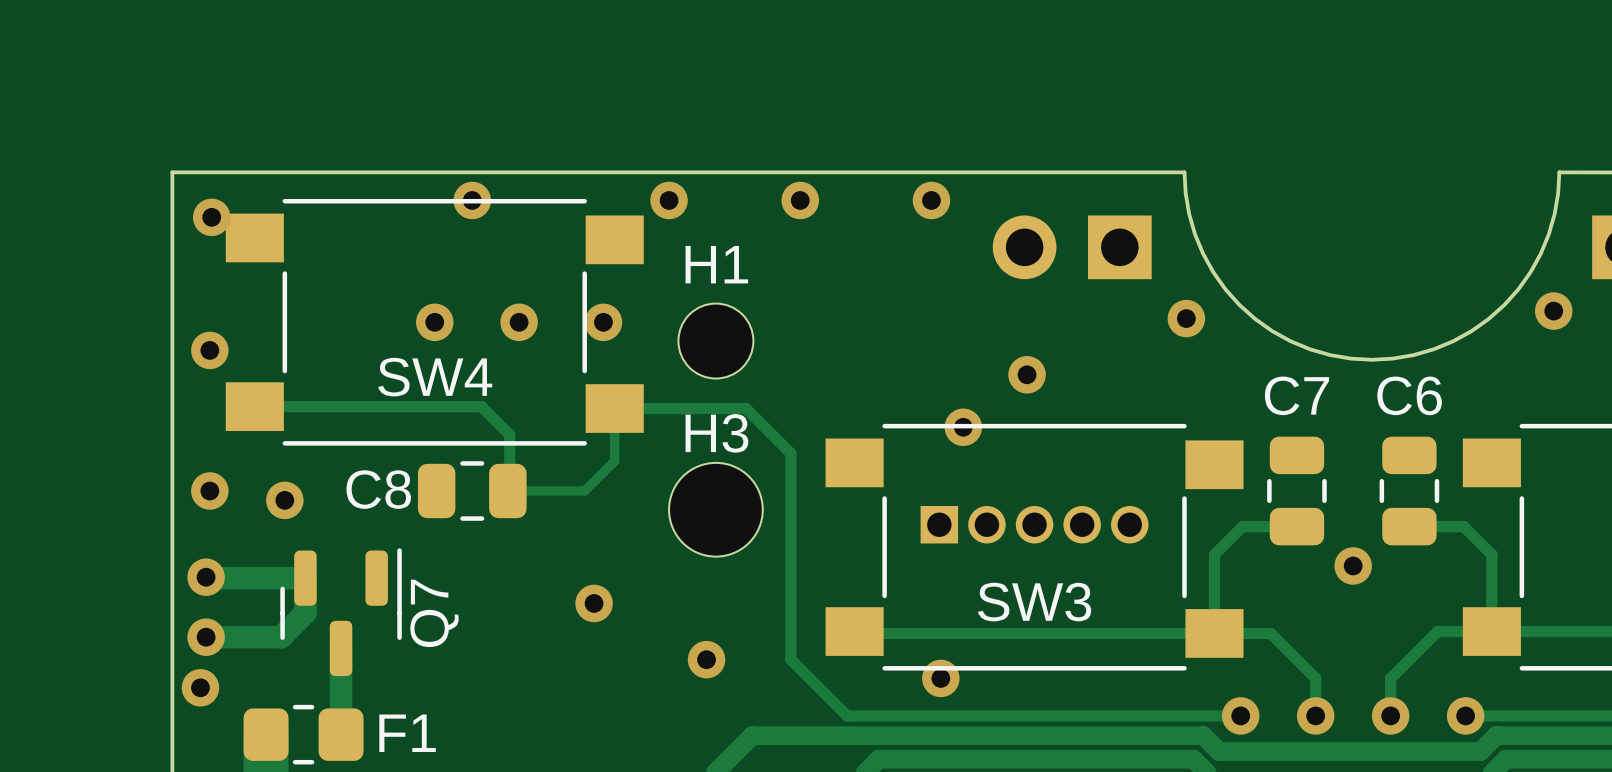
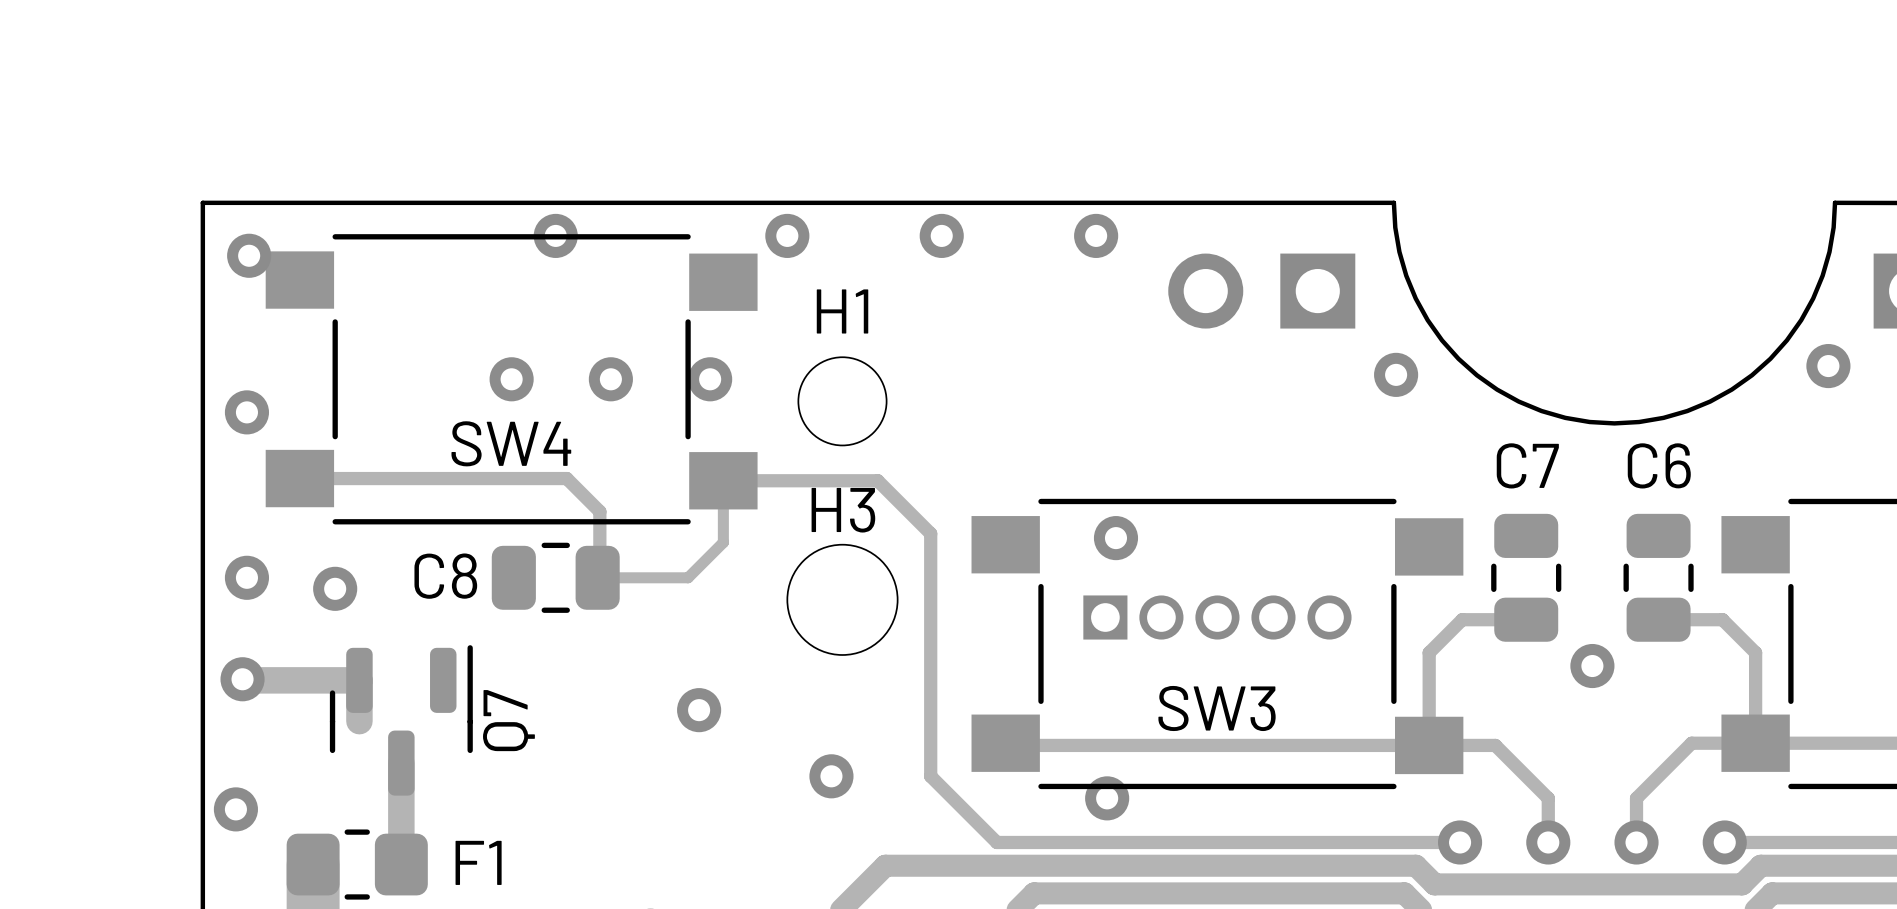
via: (1027, 374) -> none
via position: (963, 427) -> (1115, 538)
track: (305, 612) (281, 637) (206, 637) -> none
via: (206, 637) -> none

